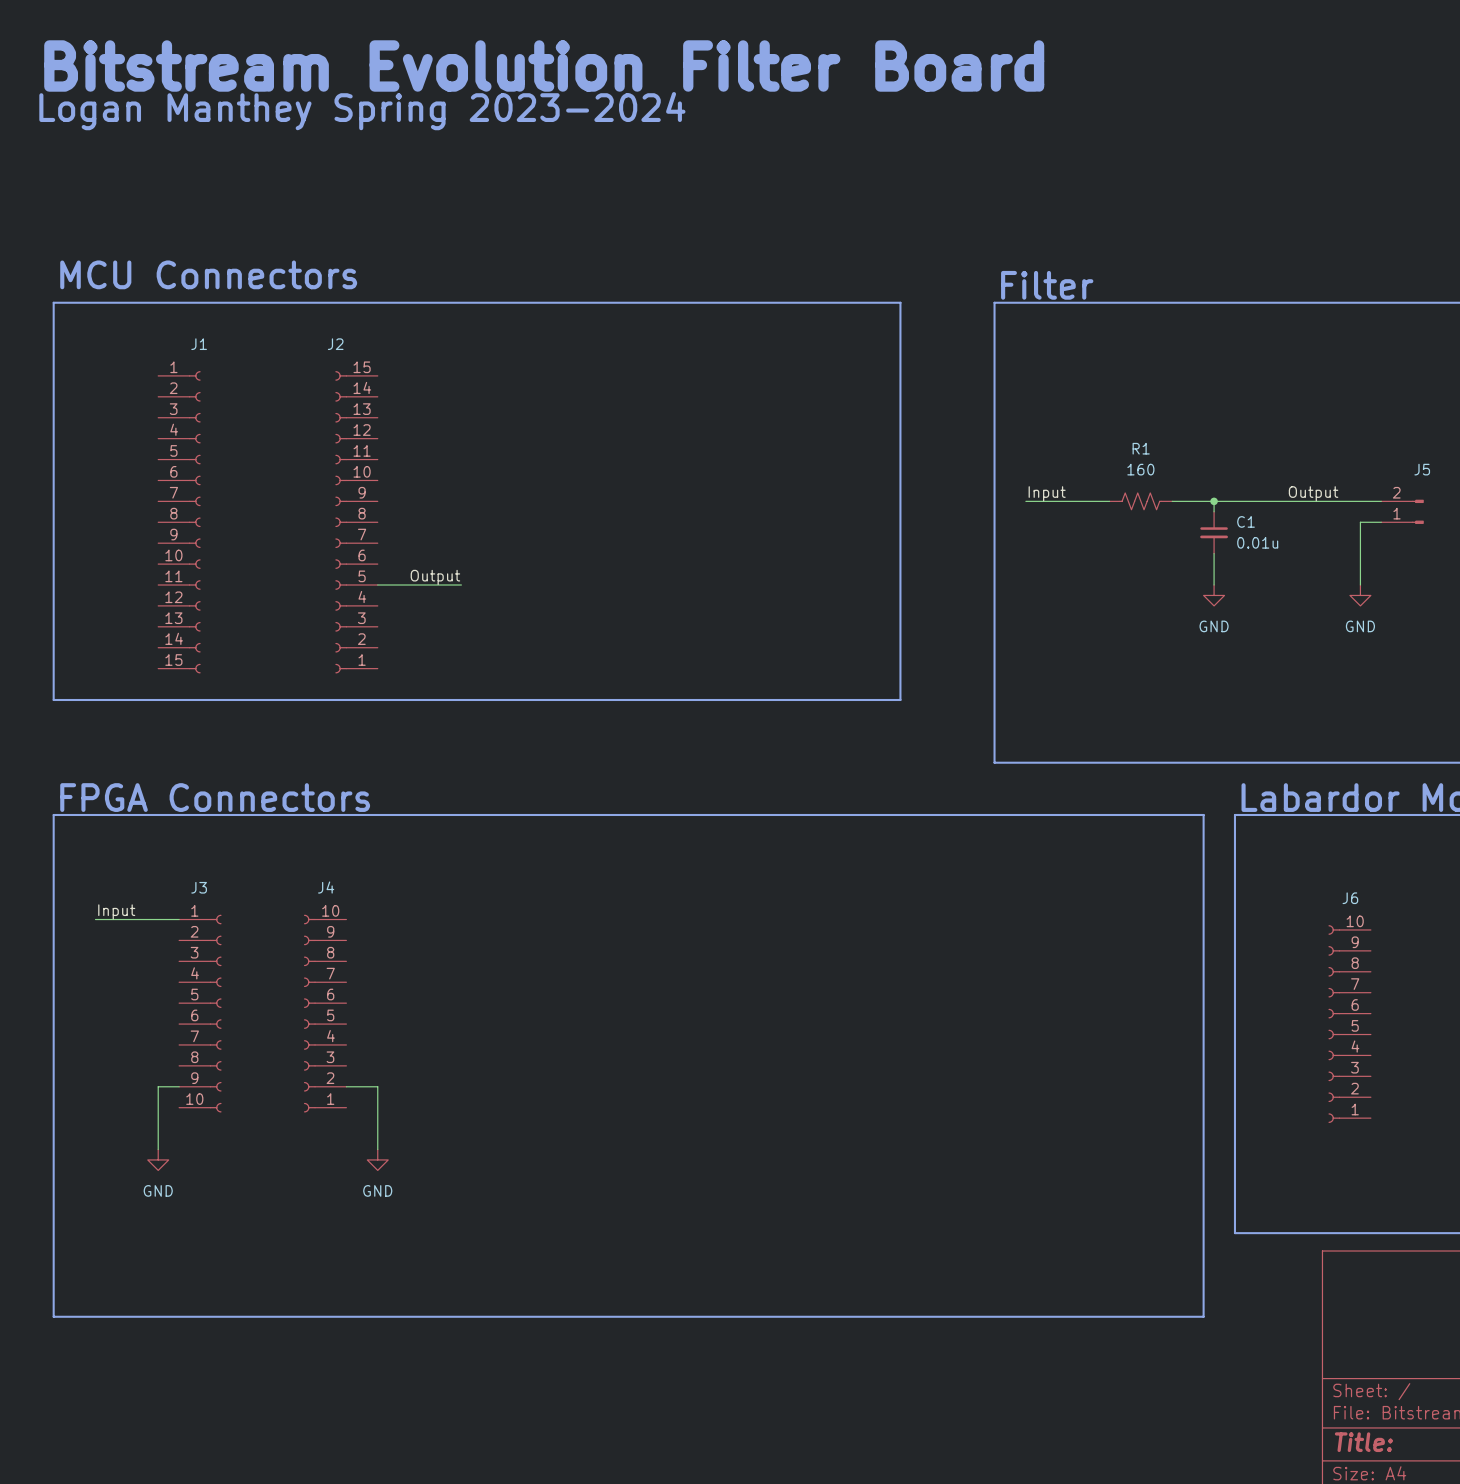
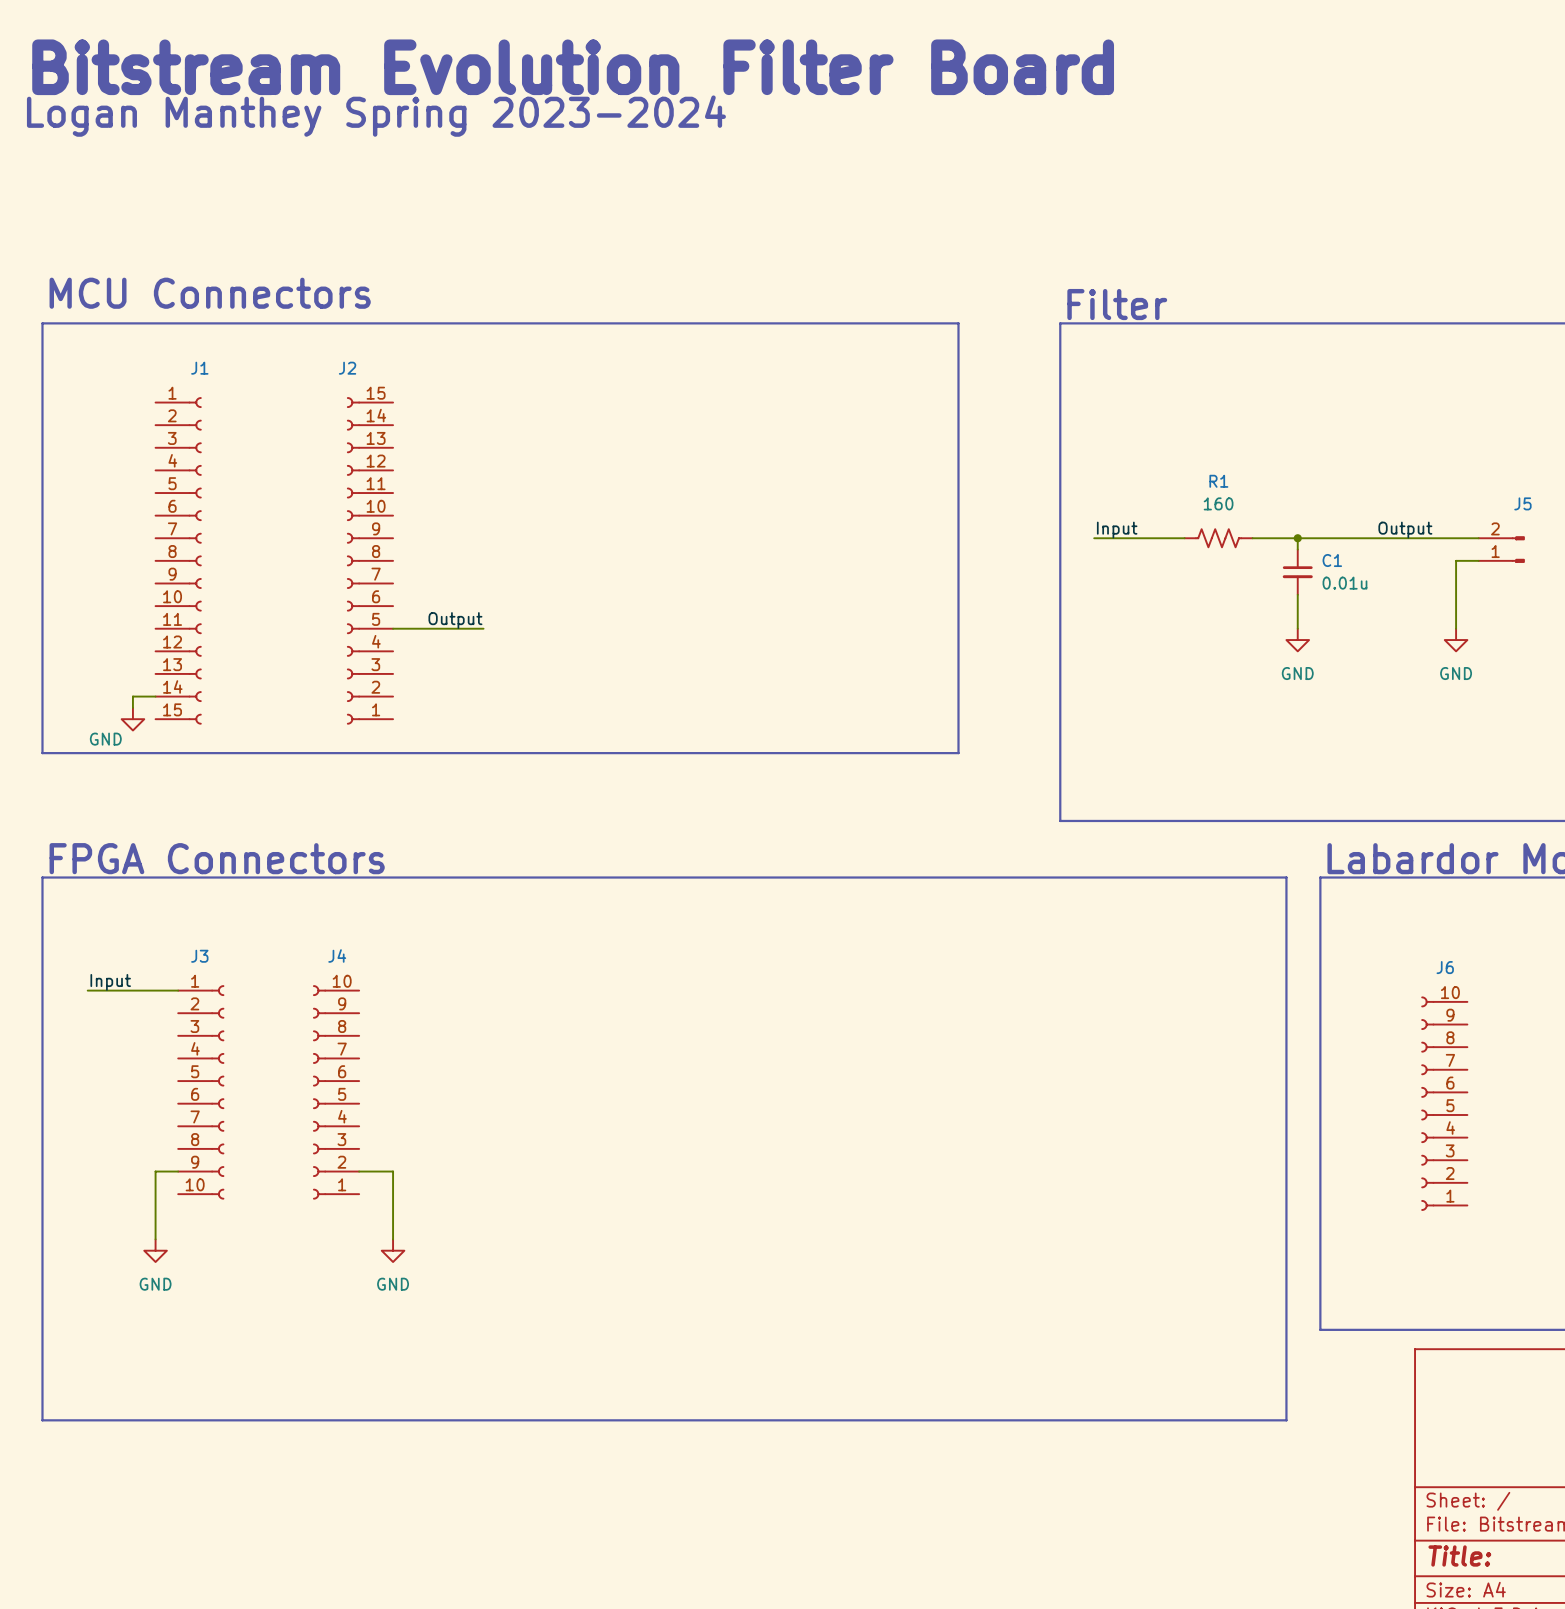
wire: none -> (155, 696) (132, 696) (132, 707)
power symbol: none -> GND (132, 719)

